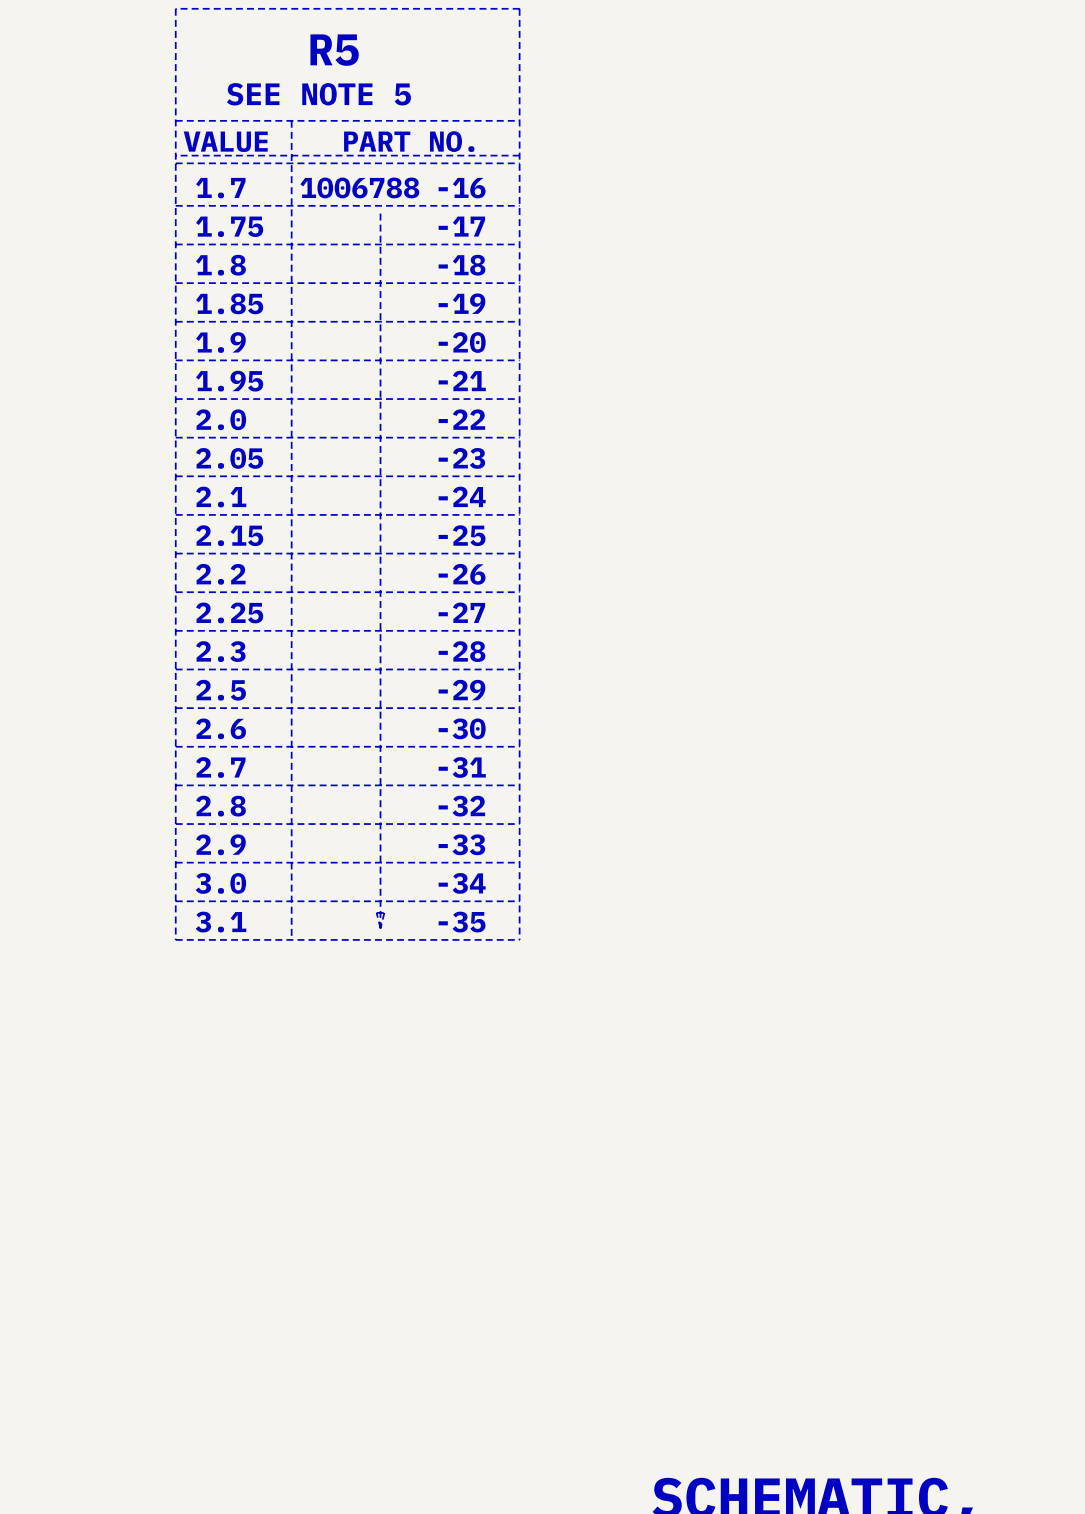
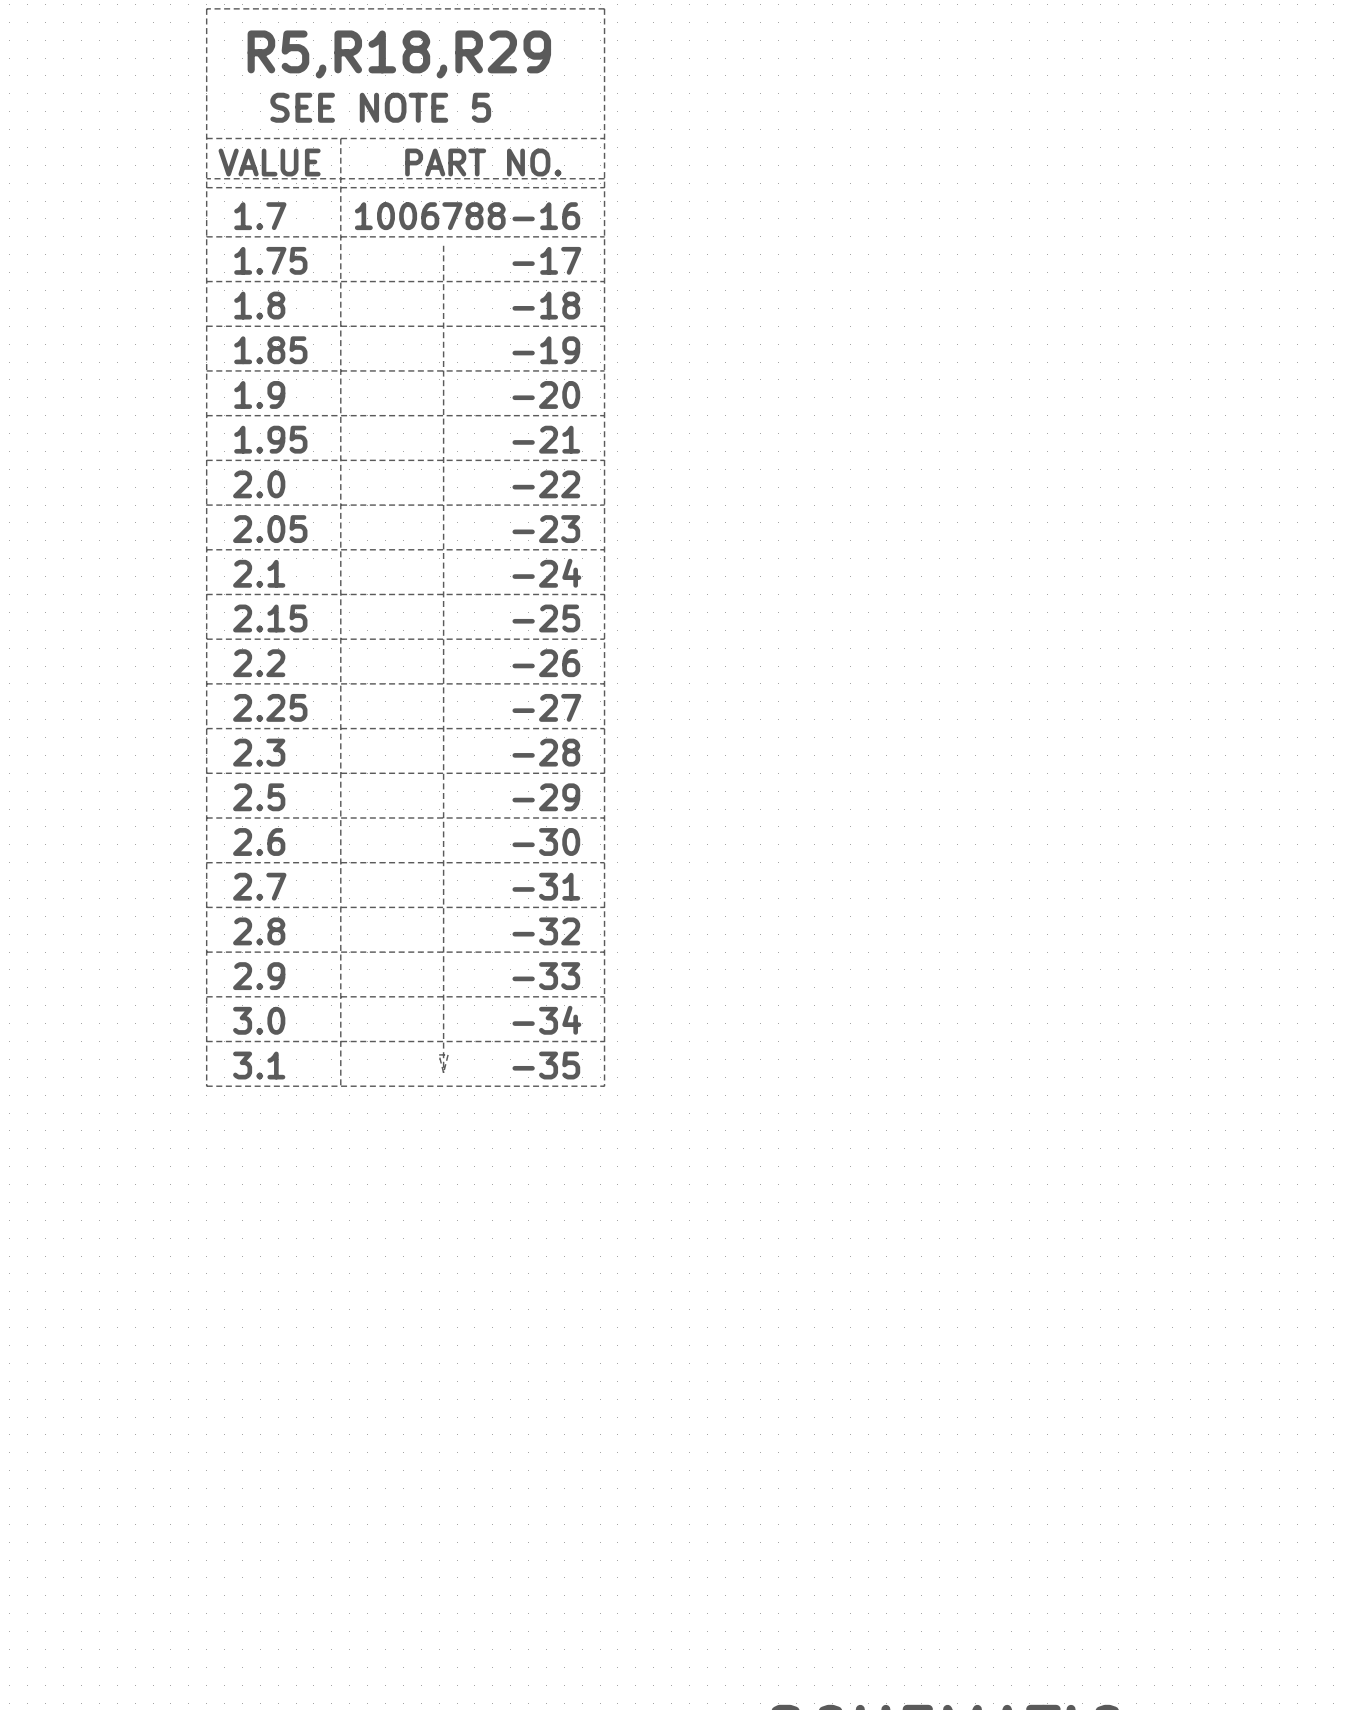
text: none -> R5,R18,R29 (399, 54)
text: R5 (334, 50) -> none

